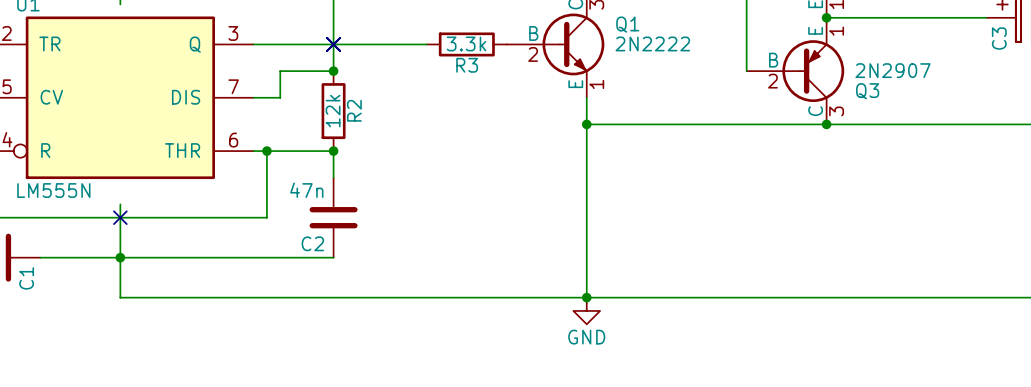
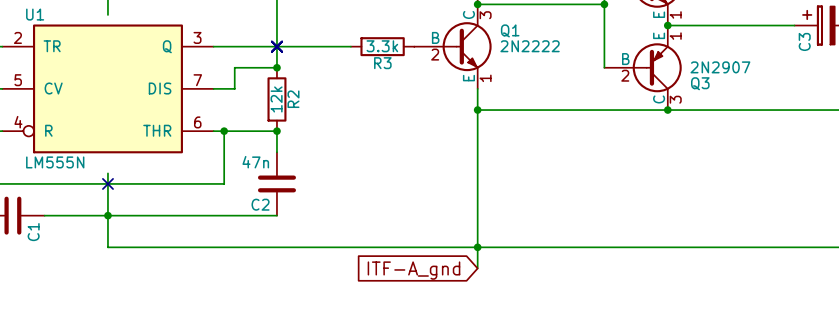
power symbol: GND (586, 310) -> none
global label: none -> ITF-A_gnd (413, 270)

